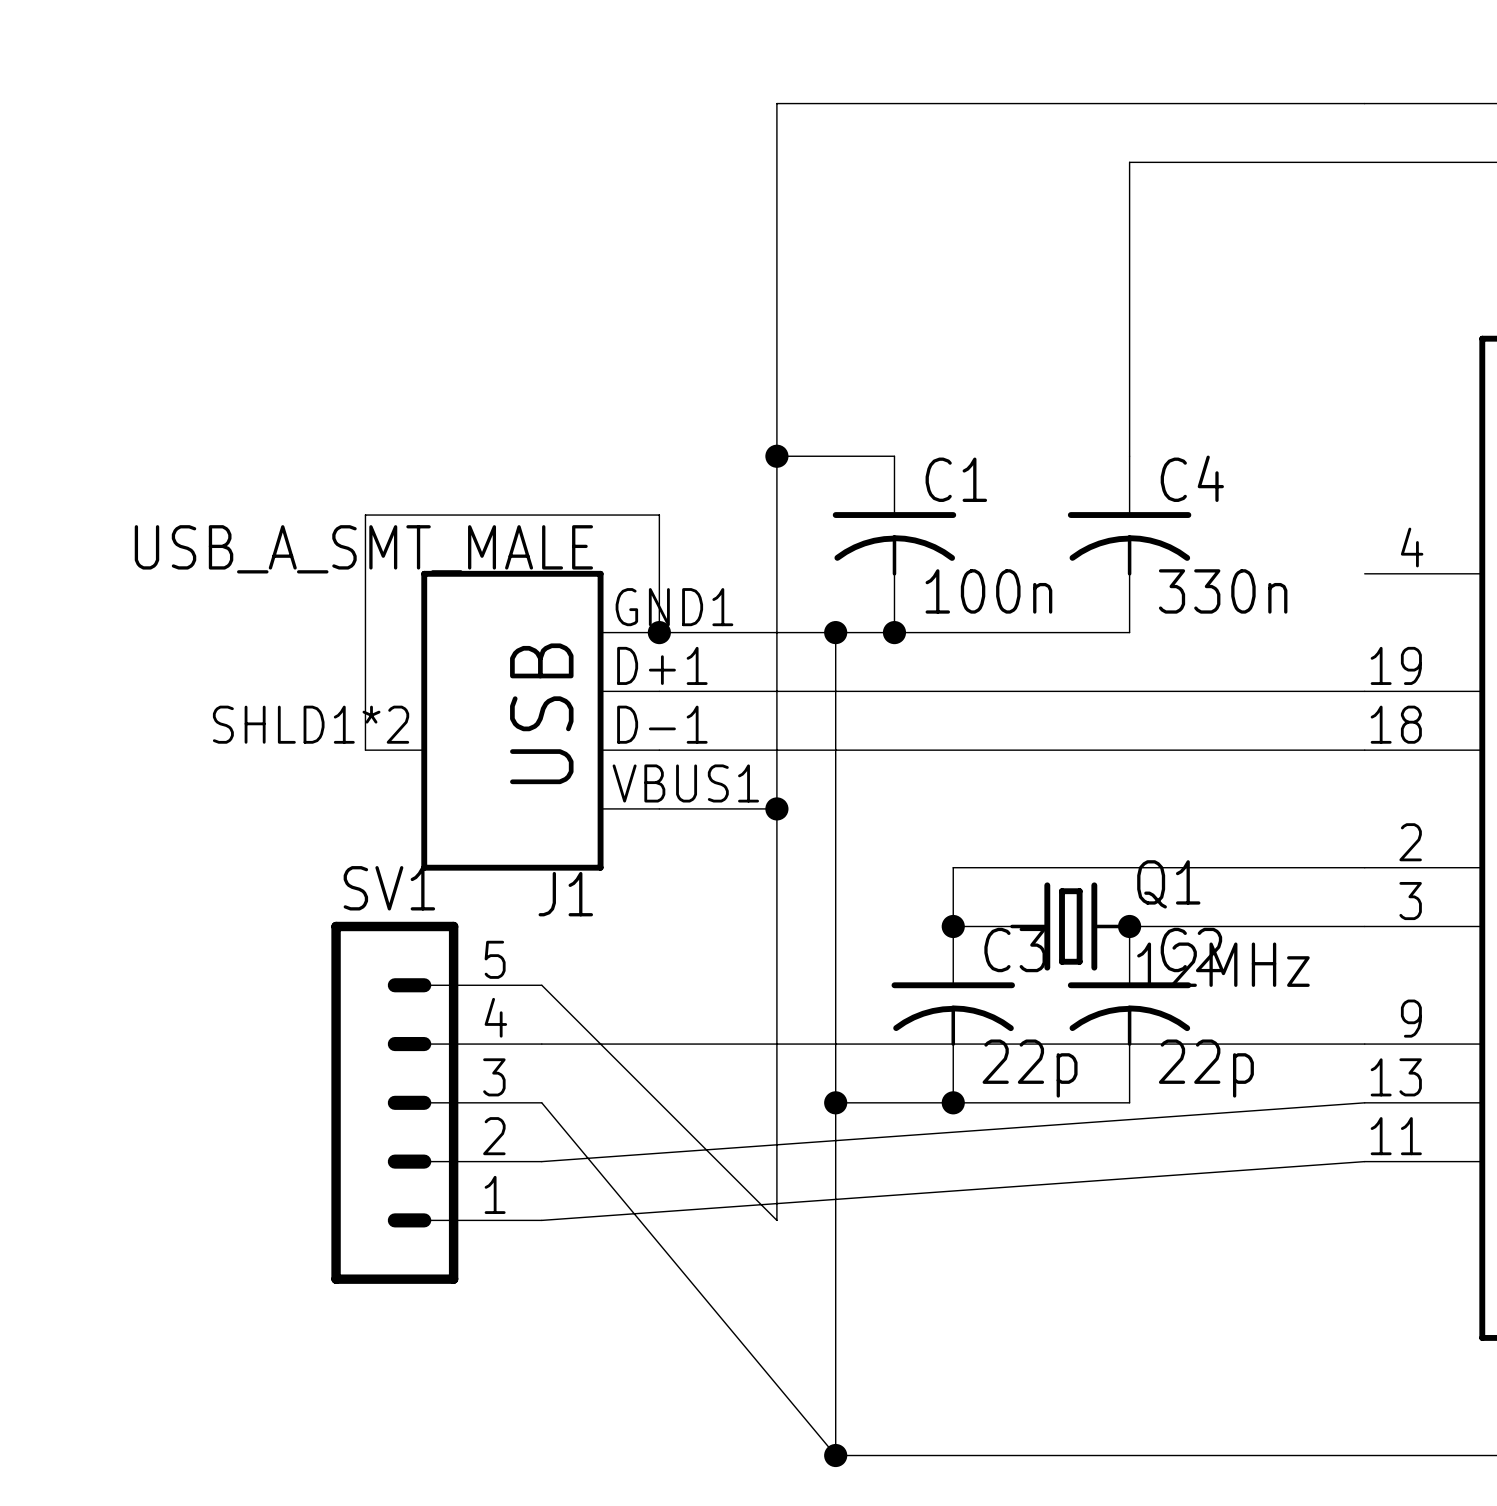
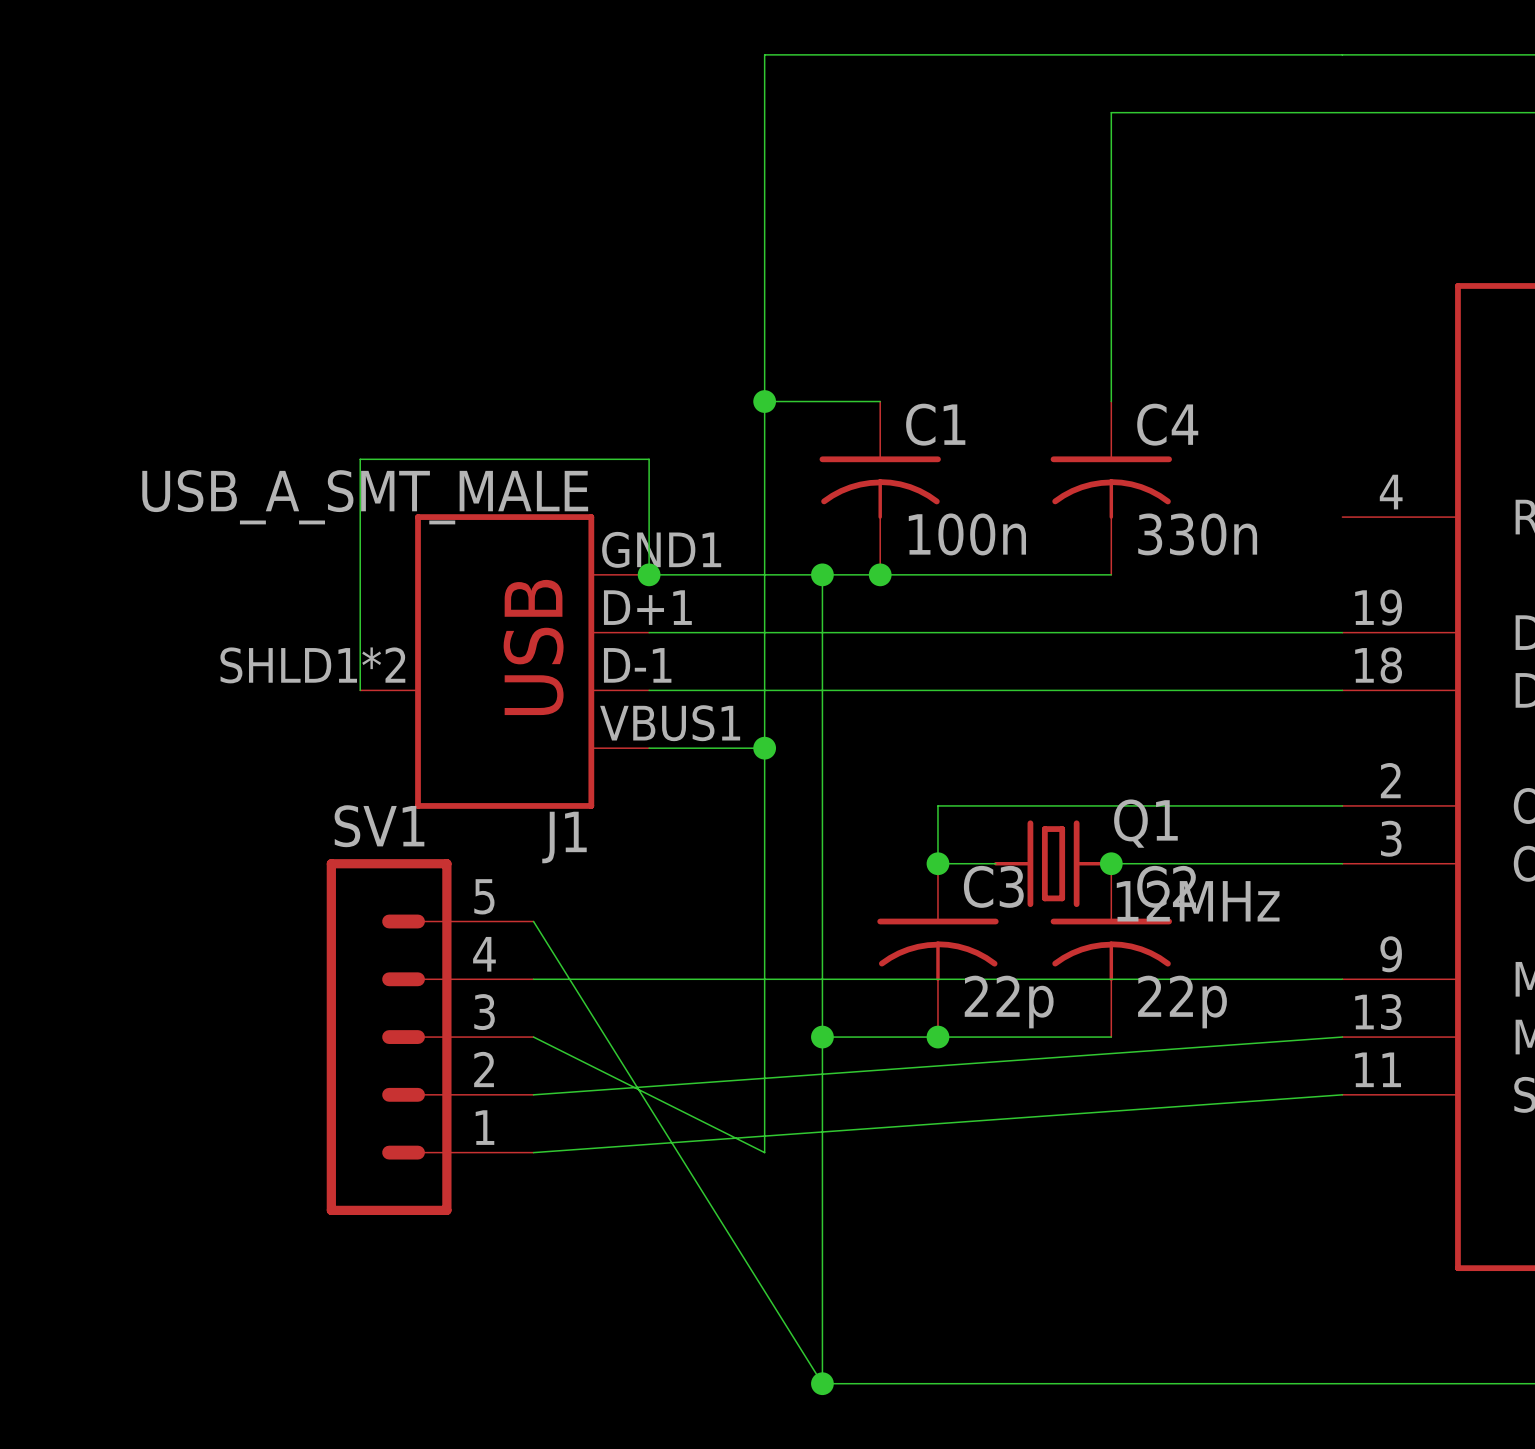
wire: (541, 985) (776, 1220) -> (533, 1037) (764, 1152)
wire: (541, 1102) (835, 1455) -> (533, 921) (822, 1383)

